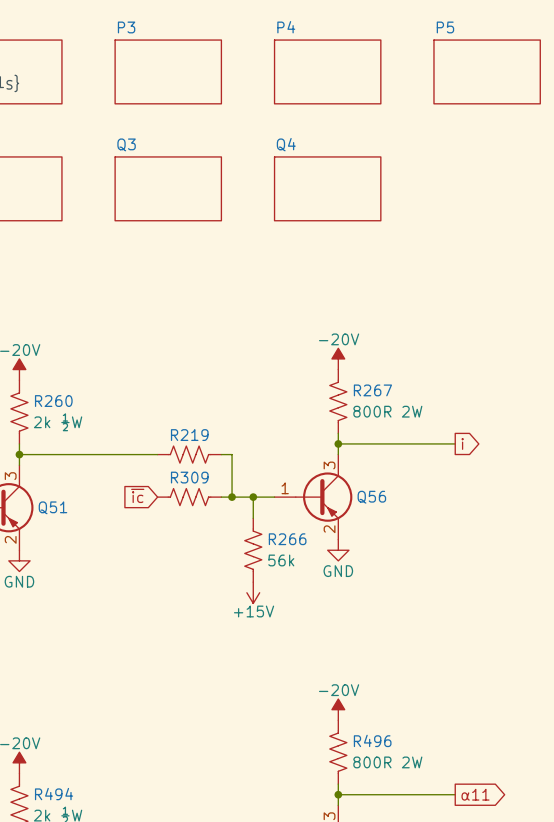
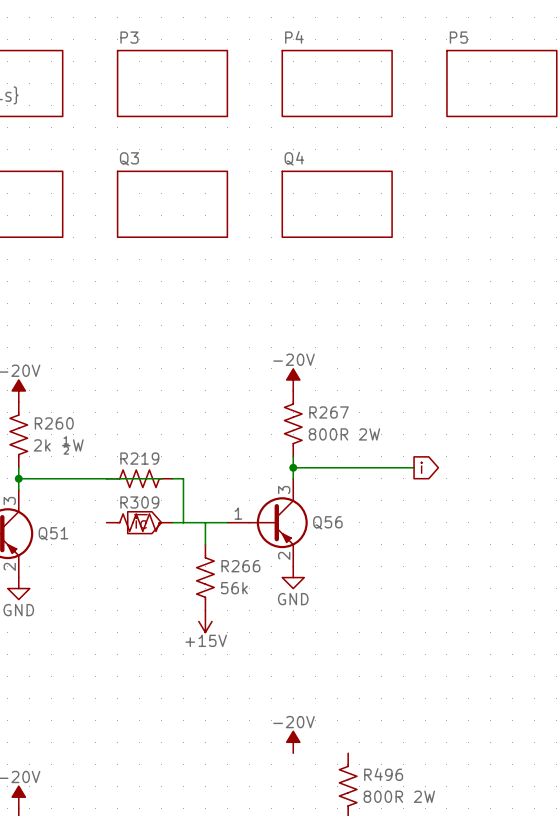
power symbol position: -20V (338, 358) -> -20V (293, 379)
R267 position: (338, 401) -> (293, 423)
wire: (338, 433) (338, 454) -> (293, 456) (293, 478)
junction: none -> (293, 467)
junction: (338, 443) -> none
wire: (402, 443) (455, 443) -> (293, 467) (348, 467)
global label position: i (462, 443) -> i (421, 467)
R219 position: (189, 454) -> (139, 478)
wire: (221, 454) (232, 454) (232, 497) -> (172, 478) (183, 478) (183, 522)
R309 position: (189, 497) -> (139, 522)
junction: (232, 497) -> none
wire: (253, 497) (253, 518) -> (205, 522) (205, 544)
junction: (253, 497) -> none
Q56 position: (313, 497) -> (267, 522)
R266 position: (253, 550) -> (205, 577)
power symbol position: GND (338, 550) -> GND (293, 577)
power symbol position: +15V (253, 592) -> +15V (205, 621)
power symbol position: -20V (338, 709) -> -20V (293, 742)

